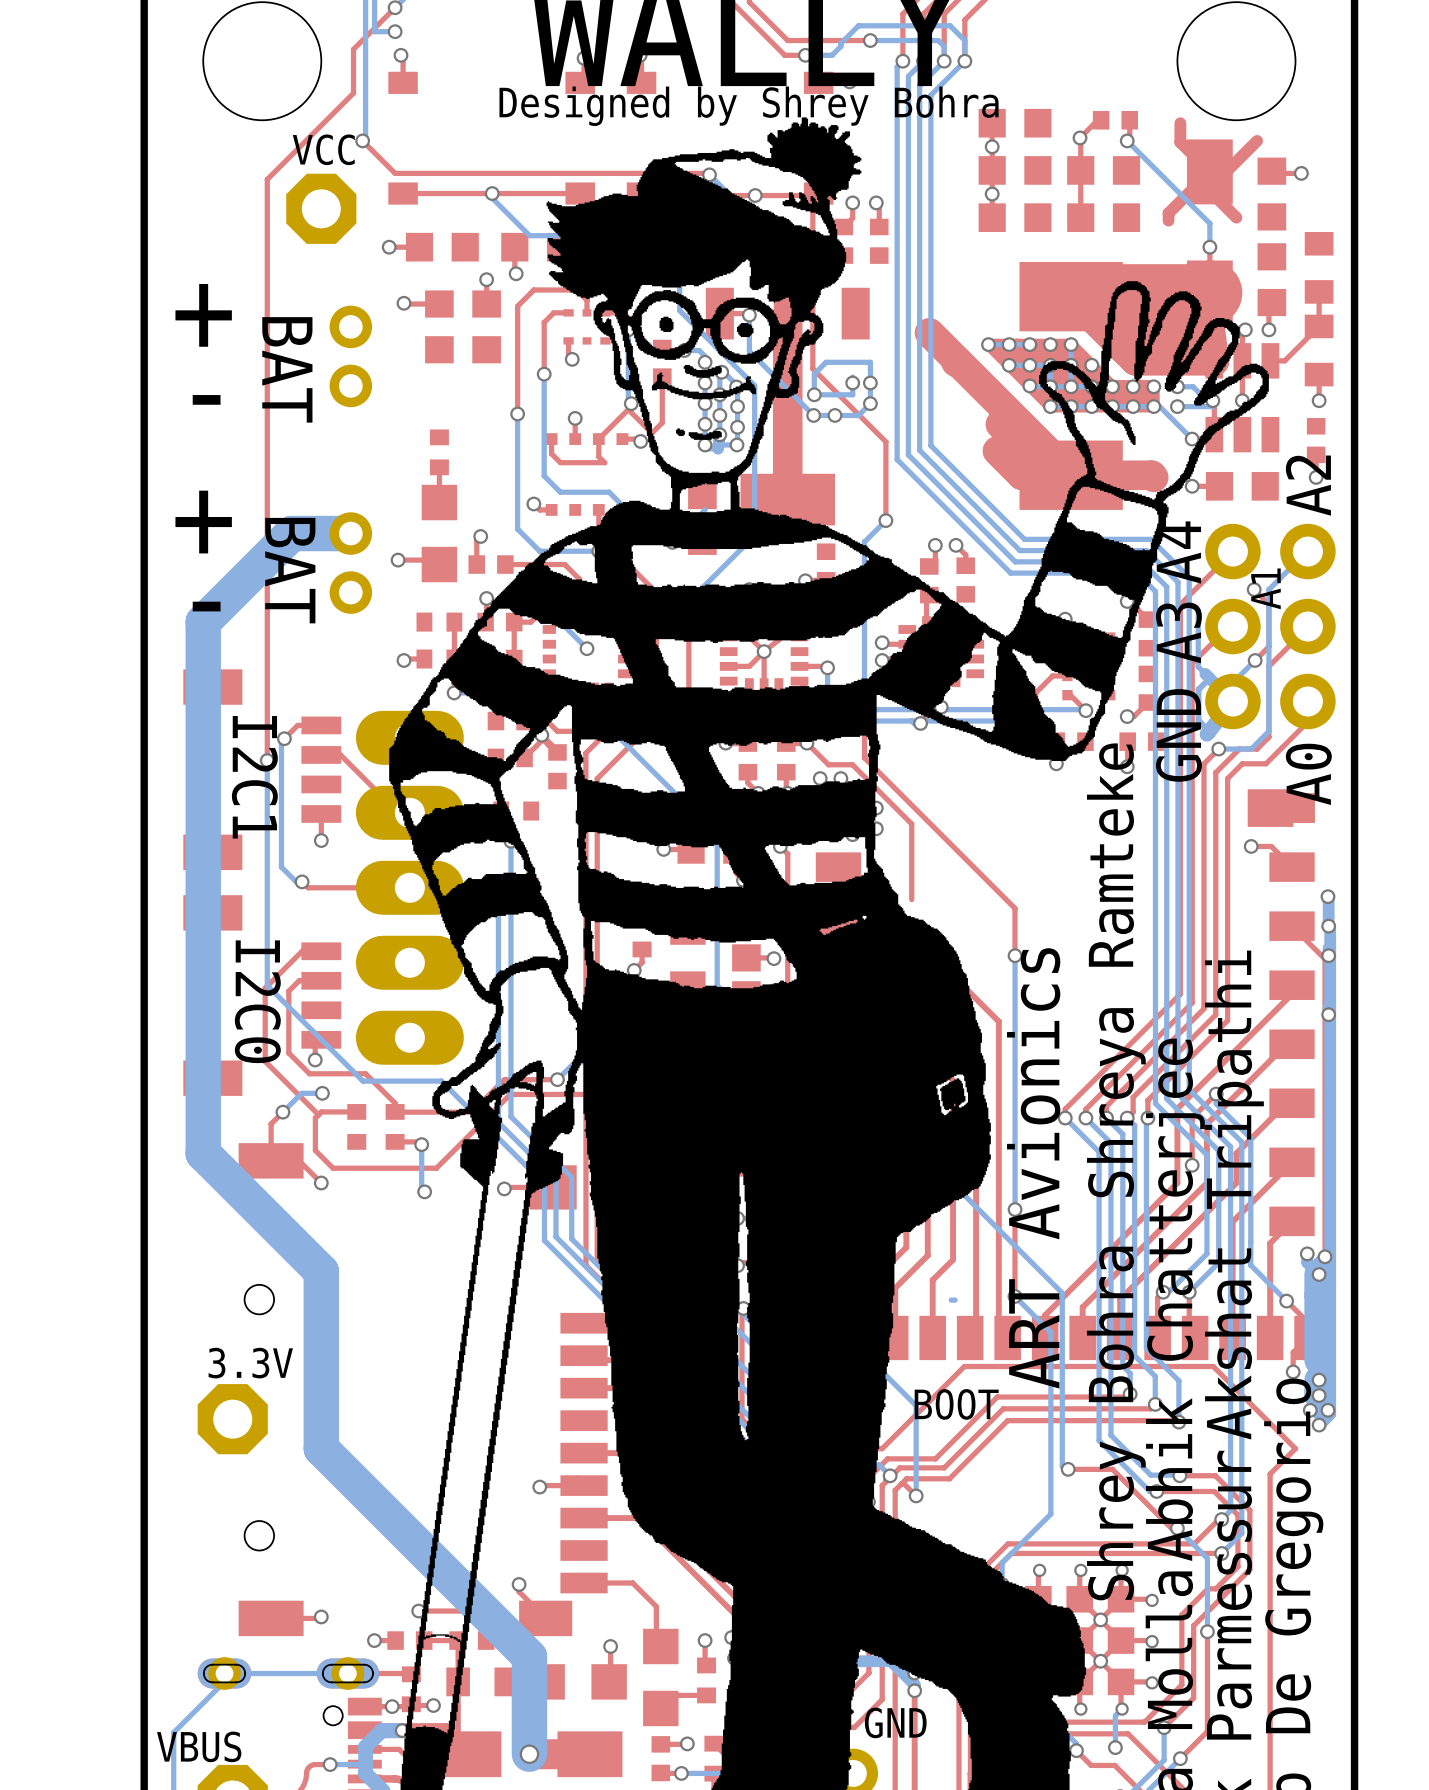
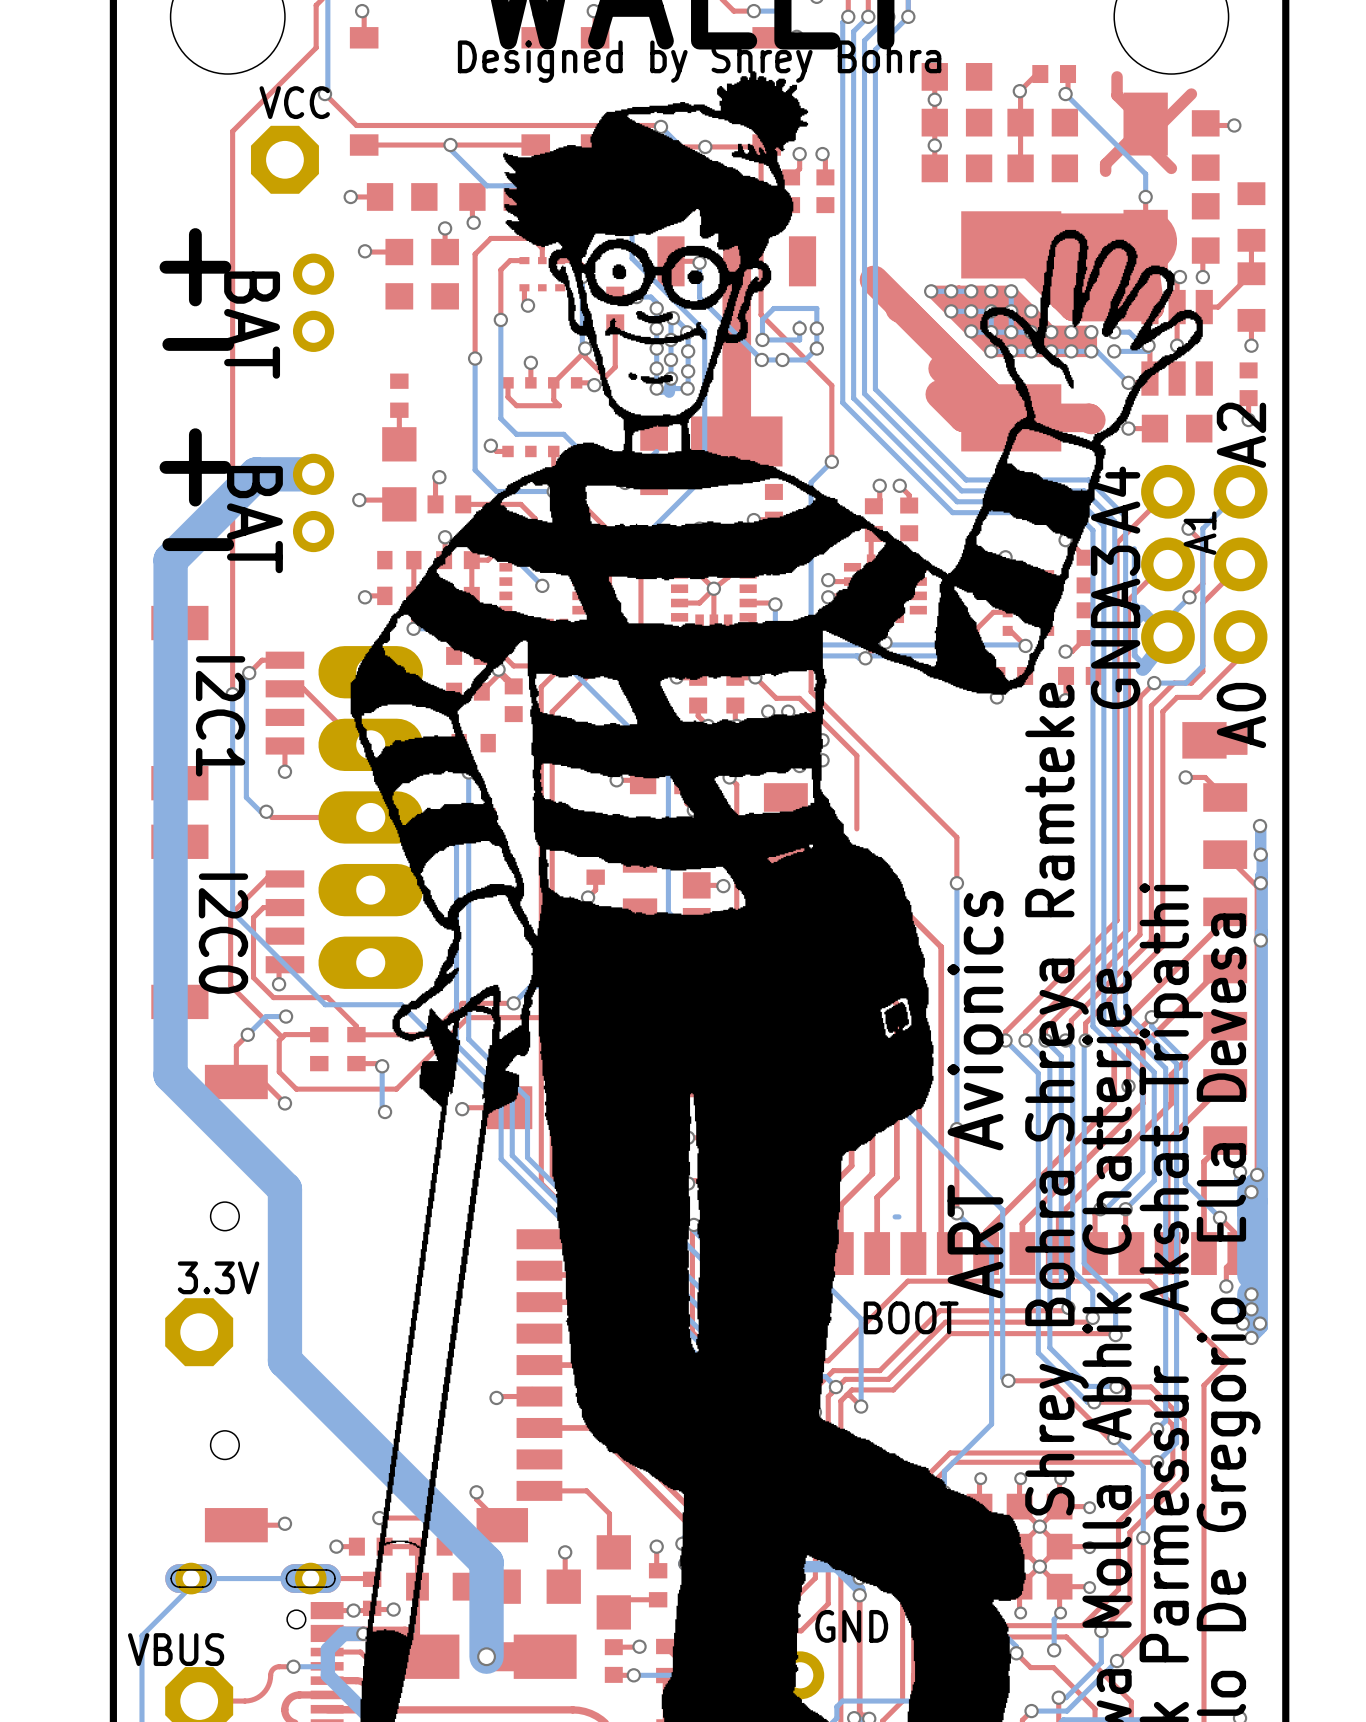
text: none -> Ella Devesa (1221, 1077)

